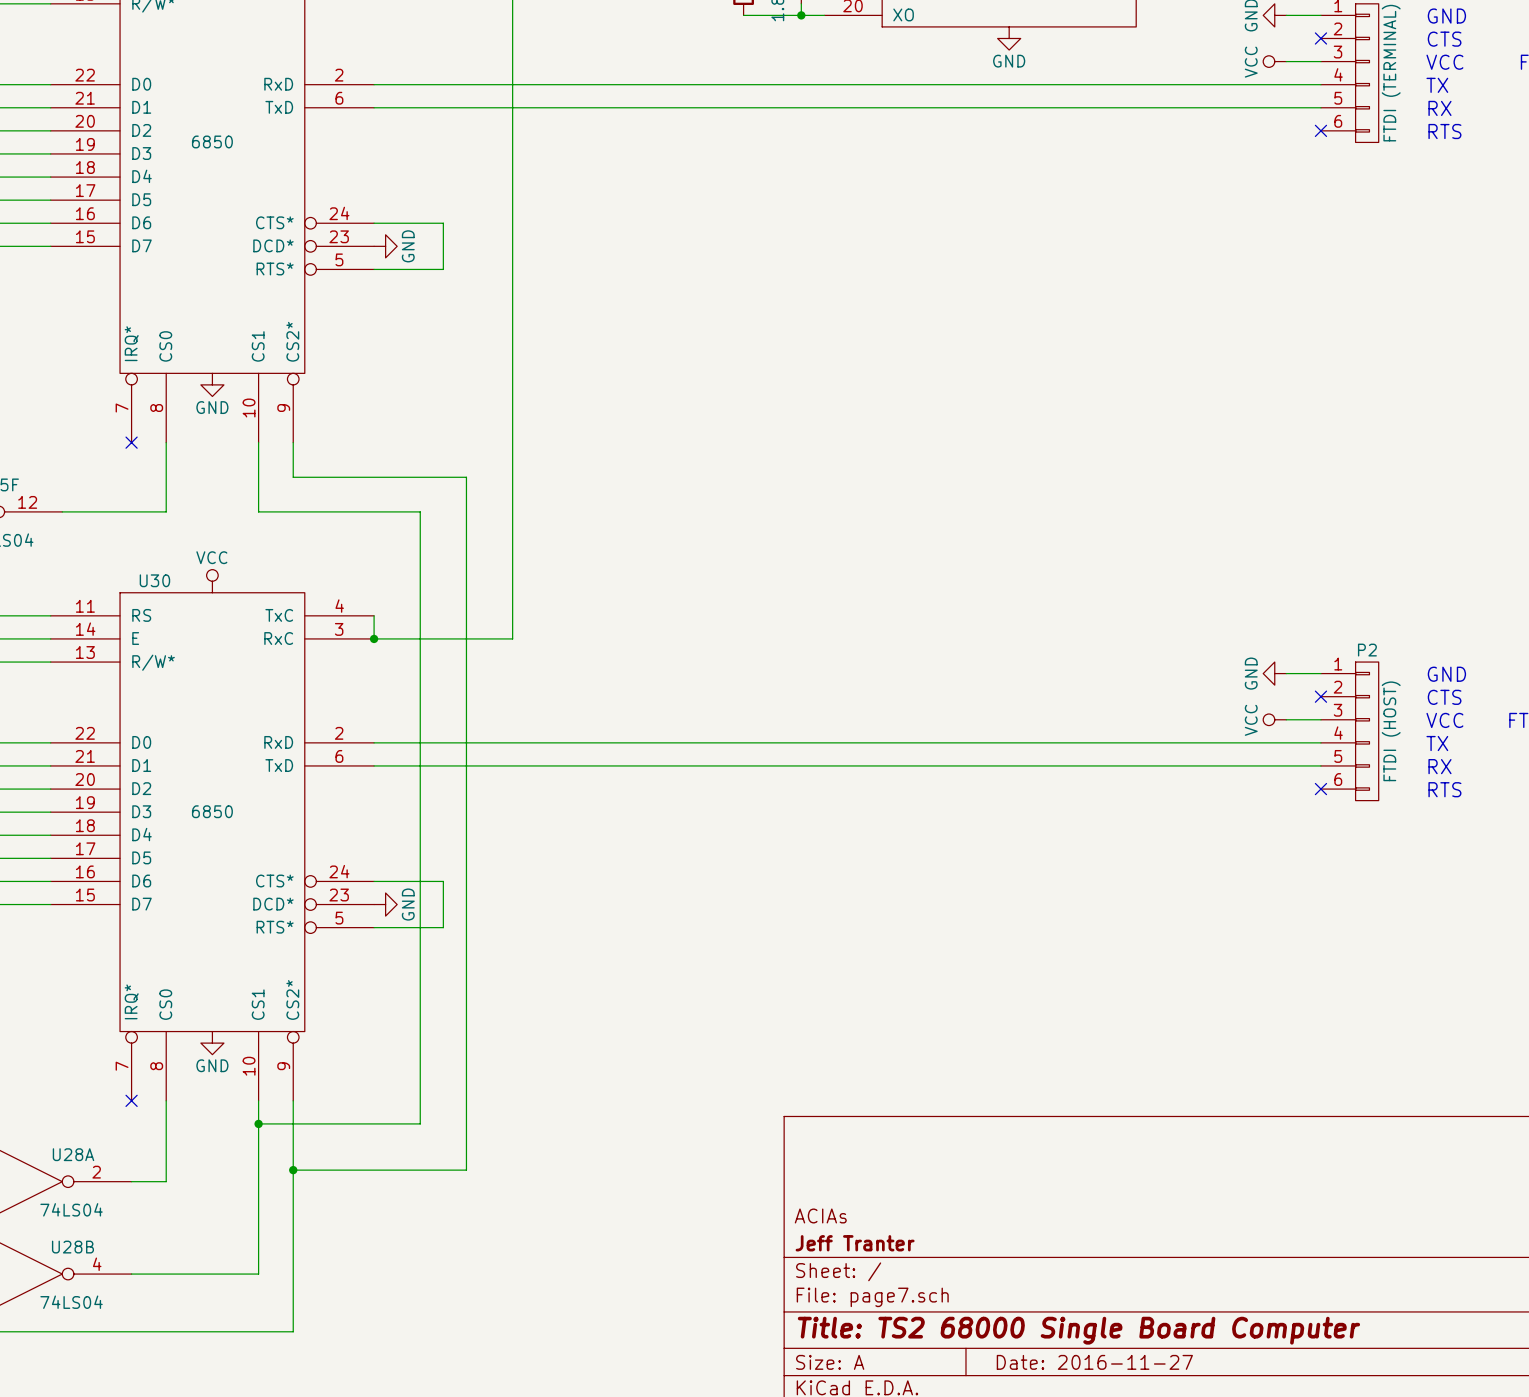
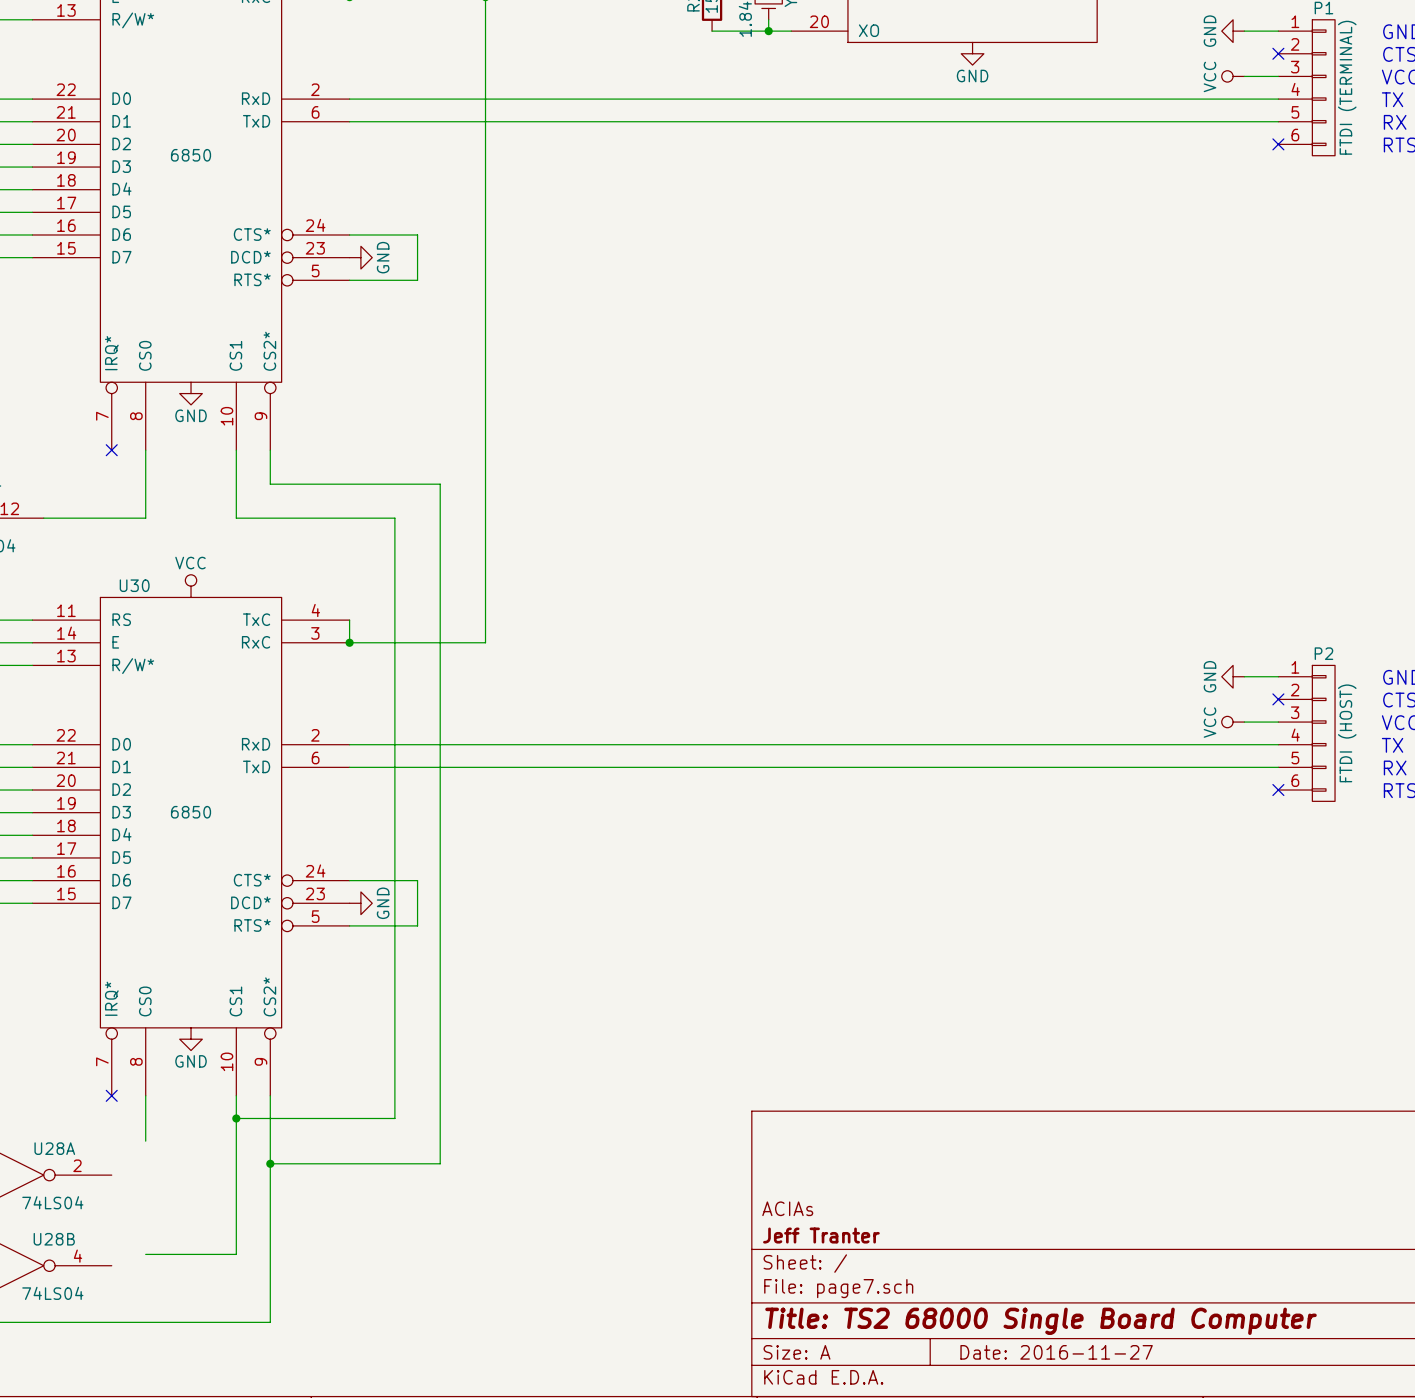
wire: (166, 1147) (166, 1181) (131, 1181) -> none
wire: (258, 1262) (258, 1274) (131, 1274) -> (236, 1254) (145, 1254)

